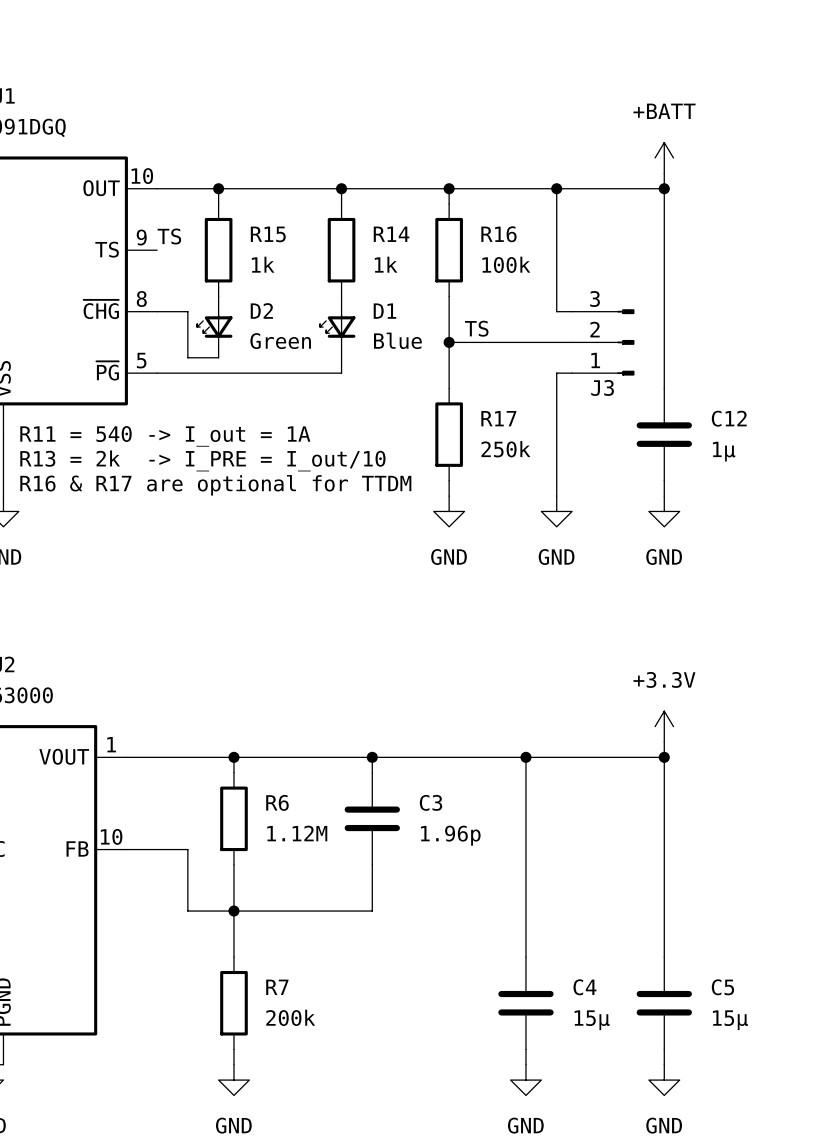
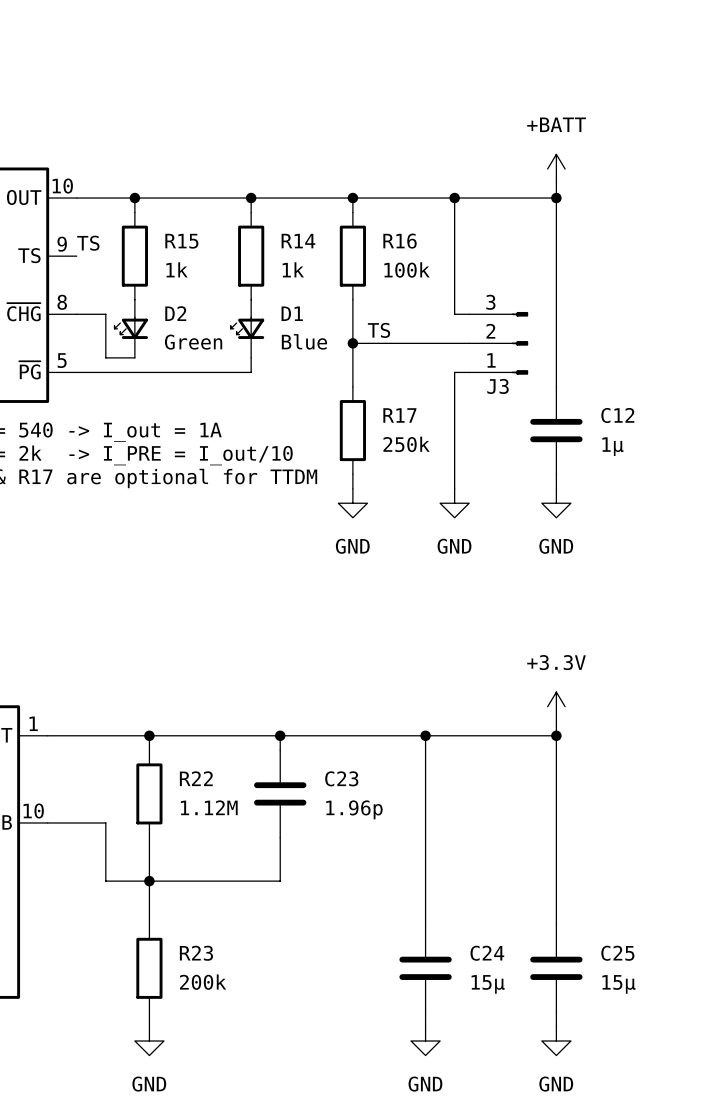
R6 name: R6 (277, 802) -> R22 (196, 778)
C3 name: C3 (431, 802) -> C23 (341, 778)
R7 name: R7 (277, 987) -> R23 (196, 953)
C4 name: C4 (584, 987) -> C24 (487, 953)
C5 name: C5 (722, 987) -> C25 (617, 953)

